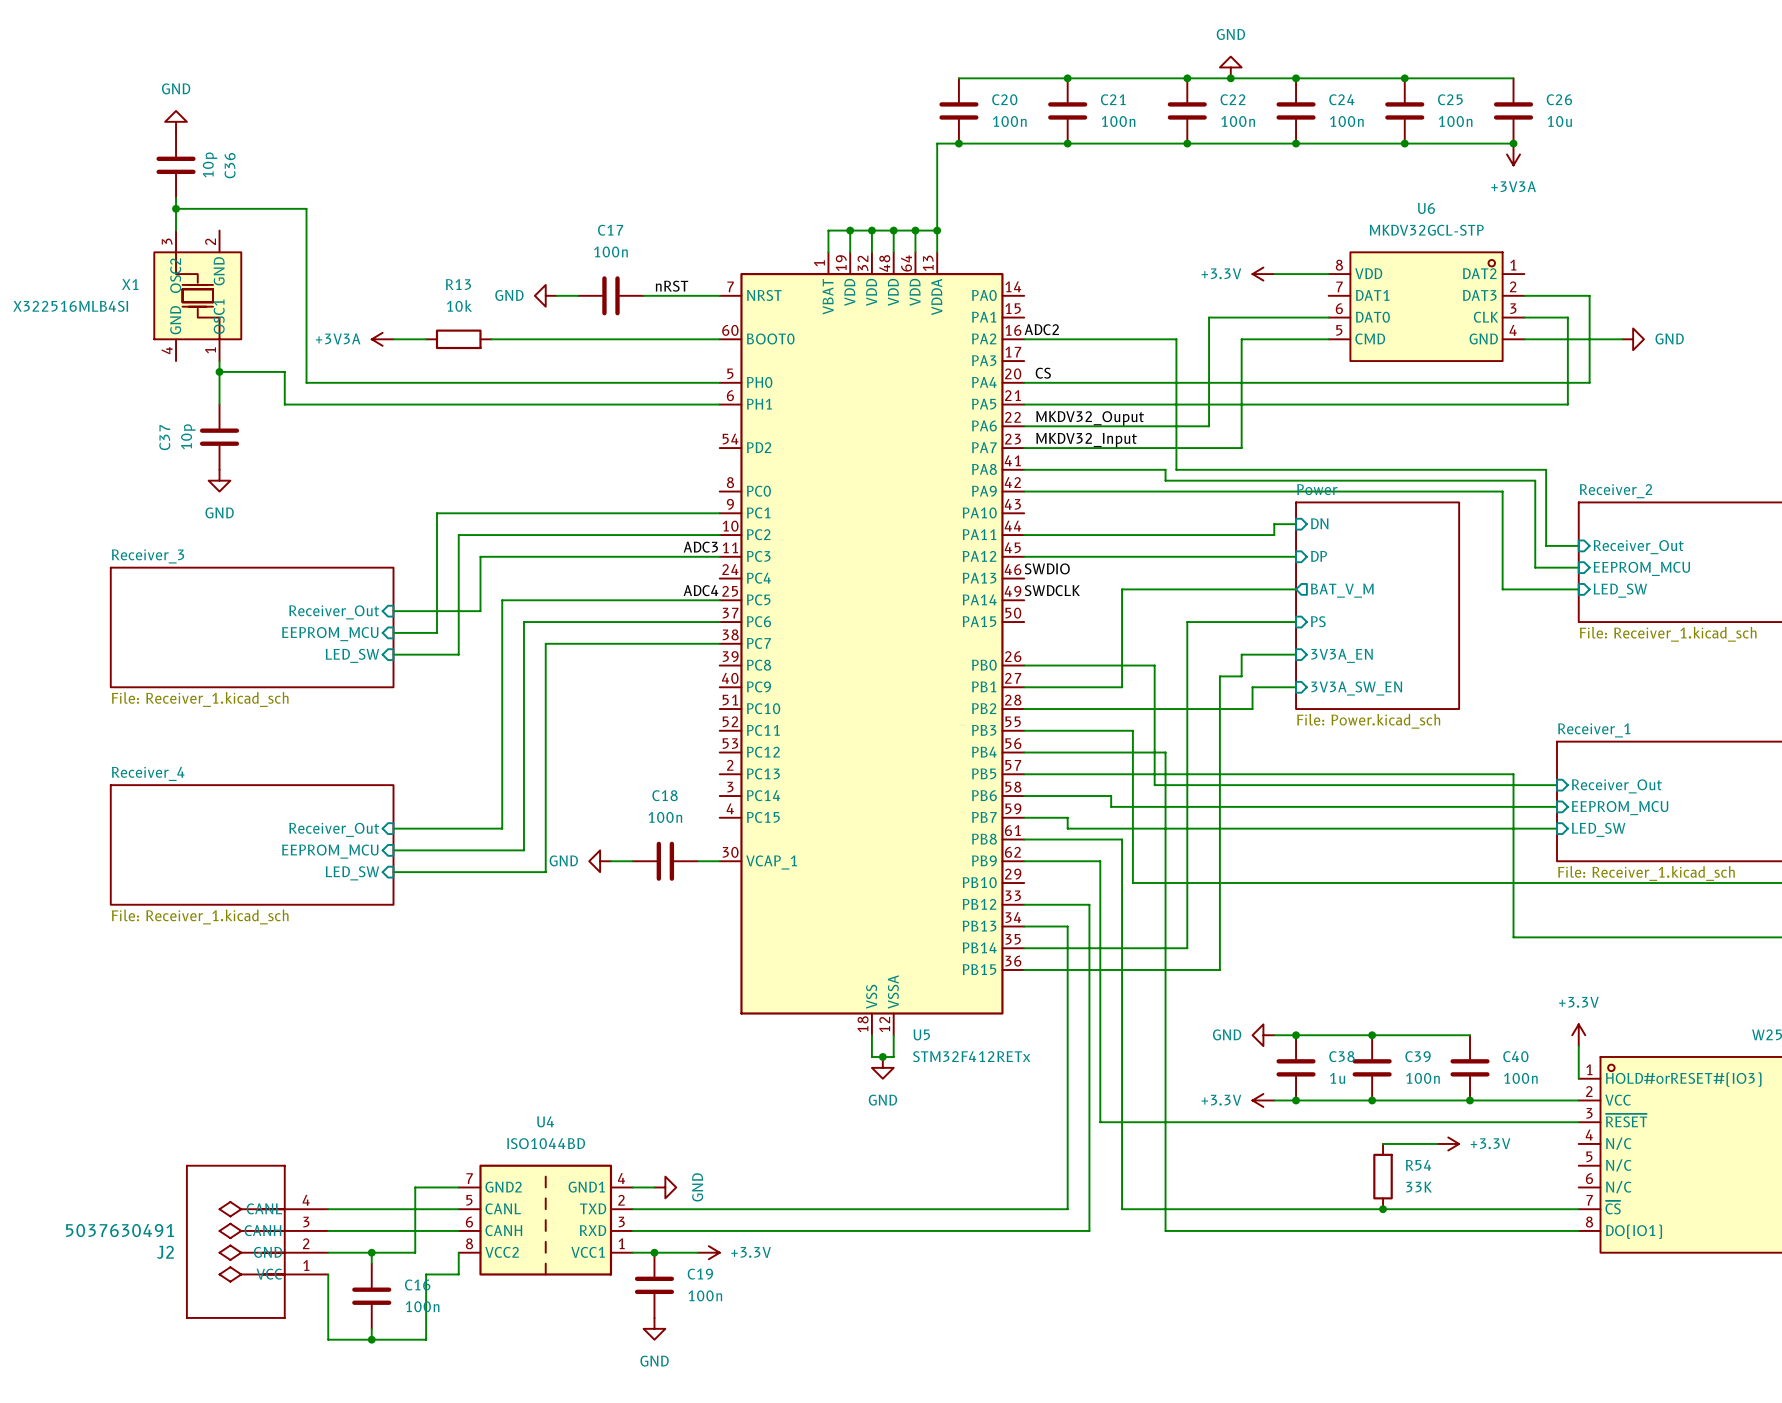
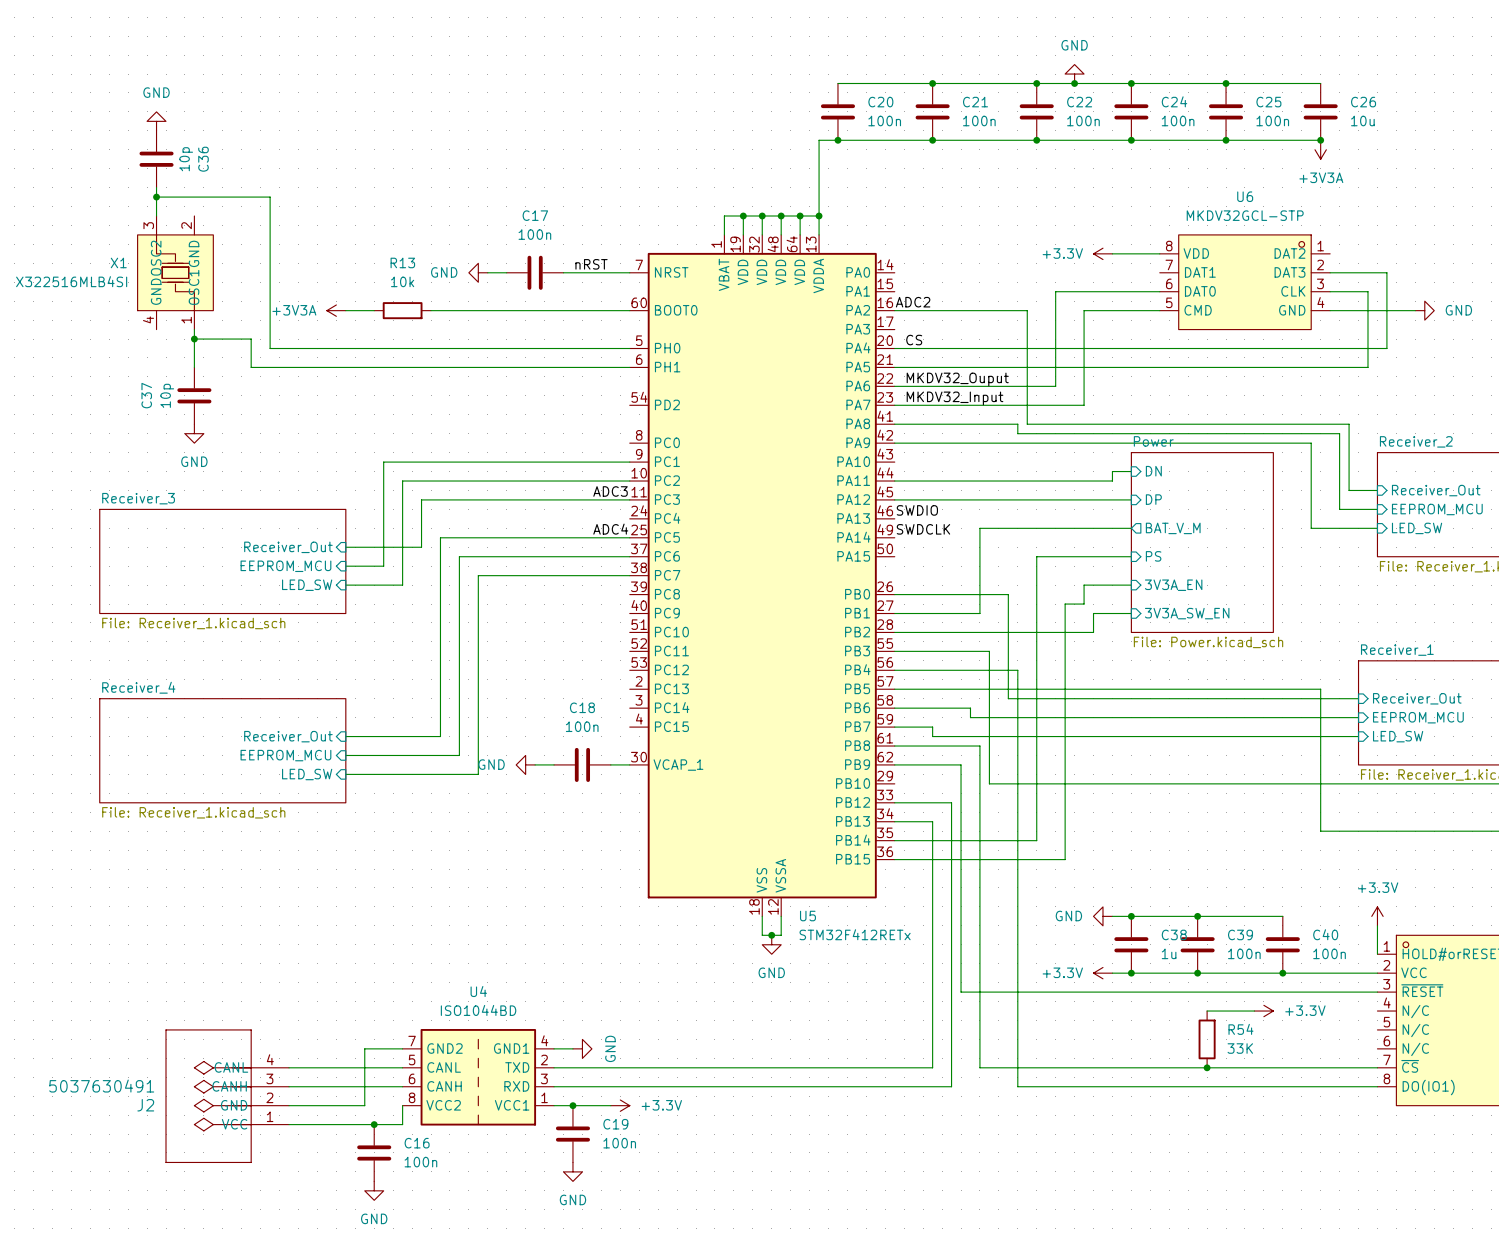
wire: (371, 1252) (371, 1263) -> none
junction: (371, 1252) -> none
wire: (328, 1274) (328, 1339) (426, 1339) (426, 1274) -> (289, 1124) (374, 1124)
junction: none -> (374, 1124)
C16 position: (371, 1296) -> (374, 1152)
wire: (371, 1328) (371, 1339) -> none
junction: (371, 1339) -> none
power symbol: none -> GND (374, 1190)

